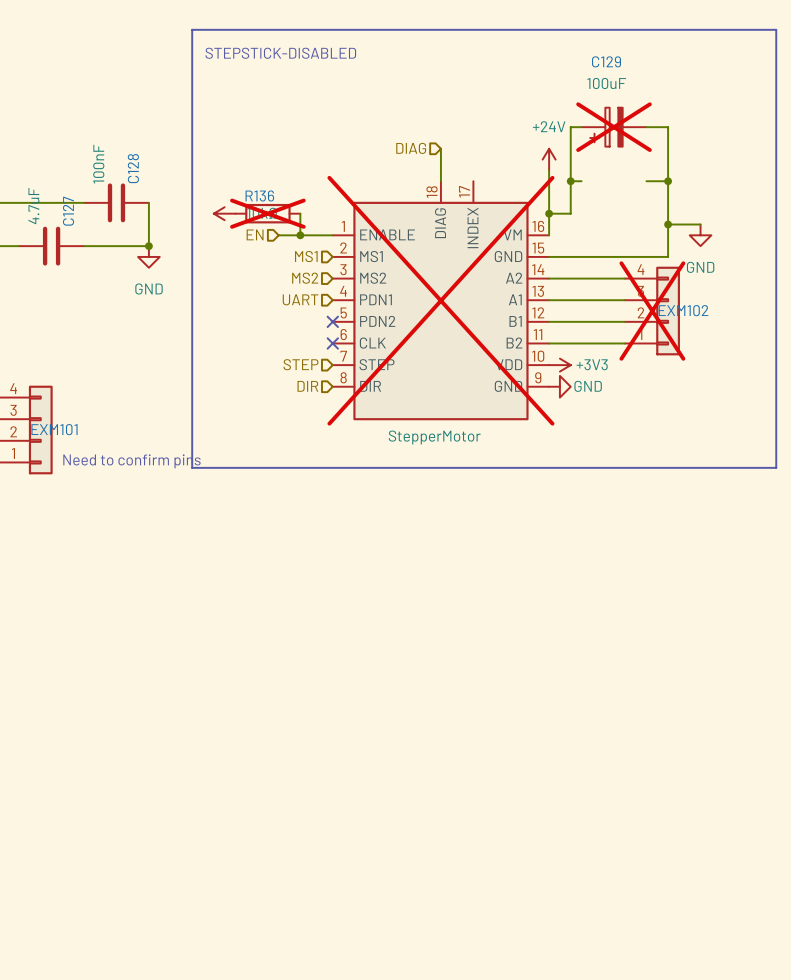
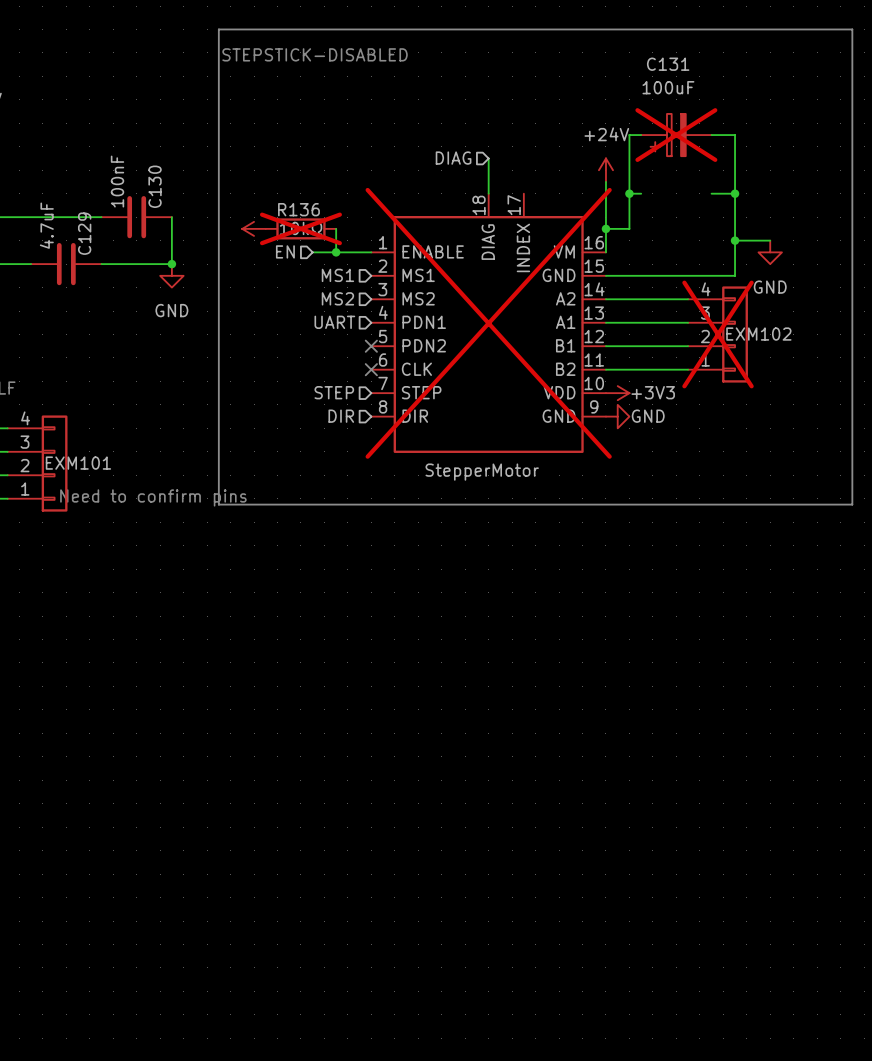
C129 name: C129 (606, 61) -> C131 (668, 64)
C128 name: C128 (133, 168) -> C130 (155, 186)
C127 name: C127 (68, 211) -> C129 (84, 233)

